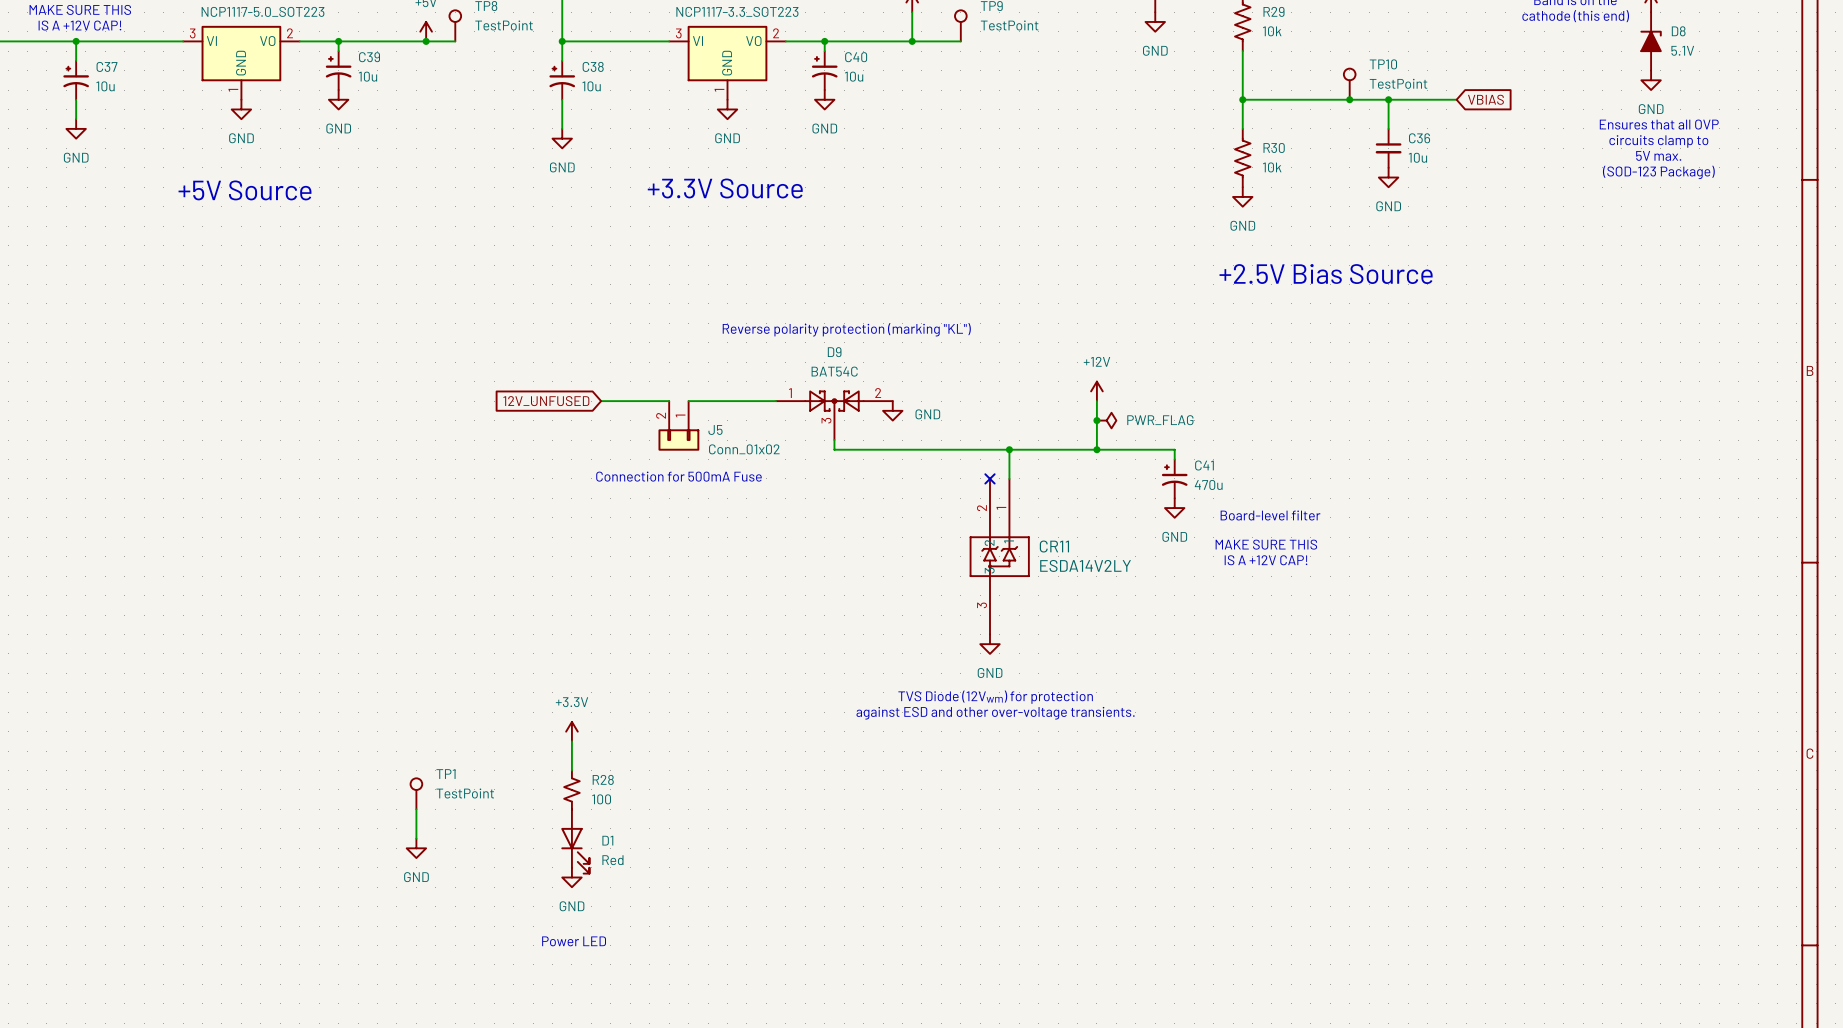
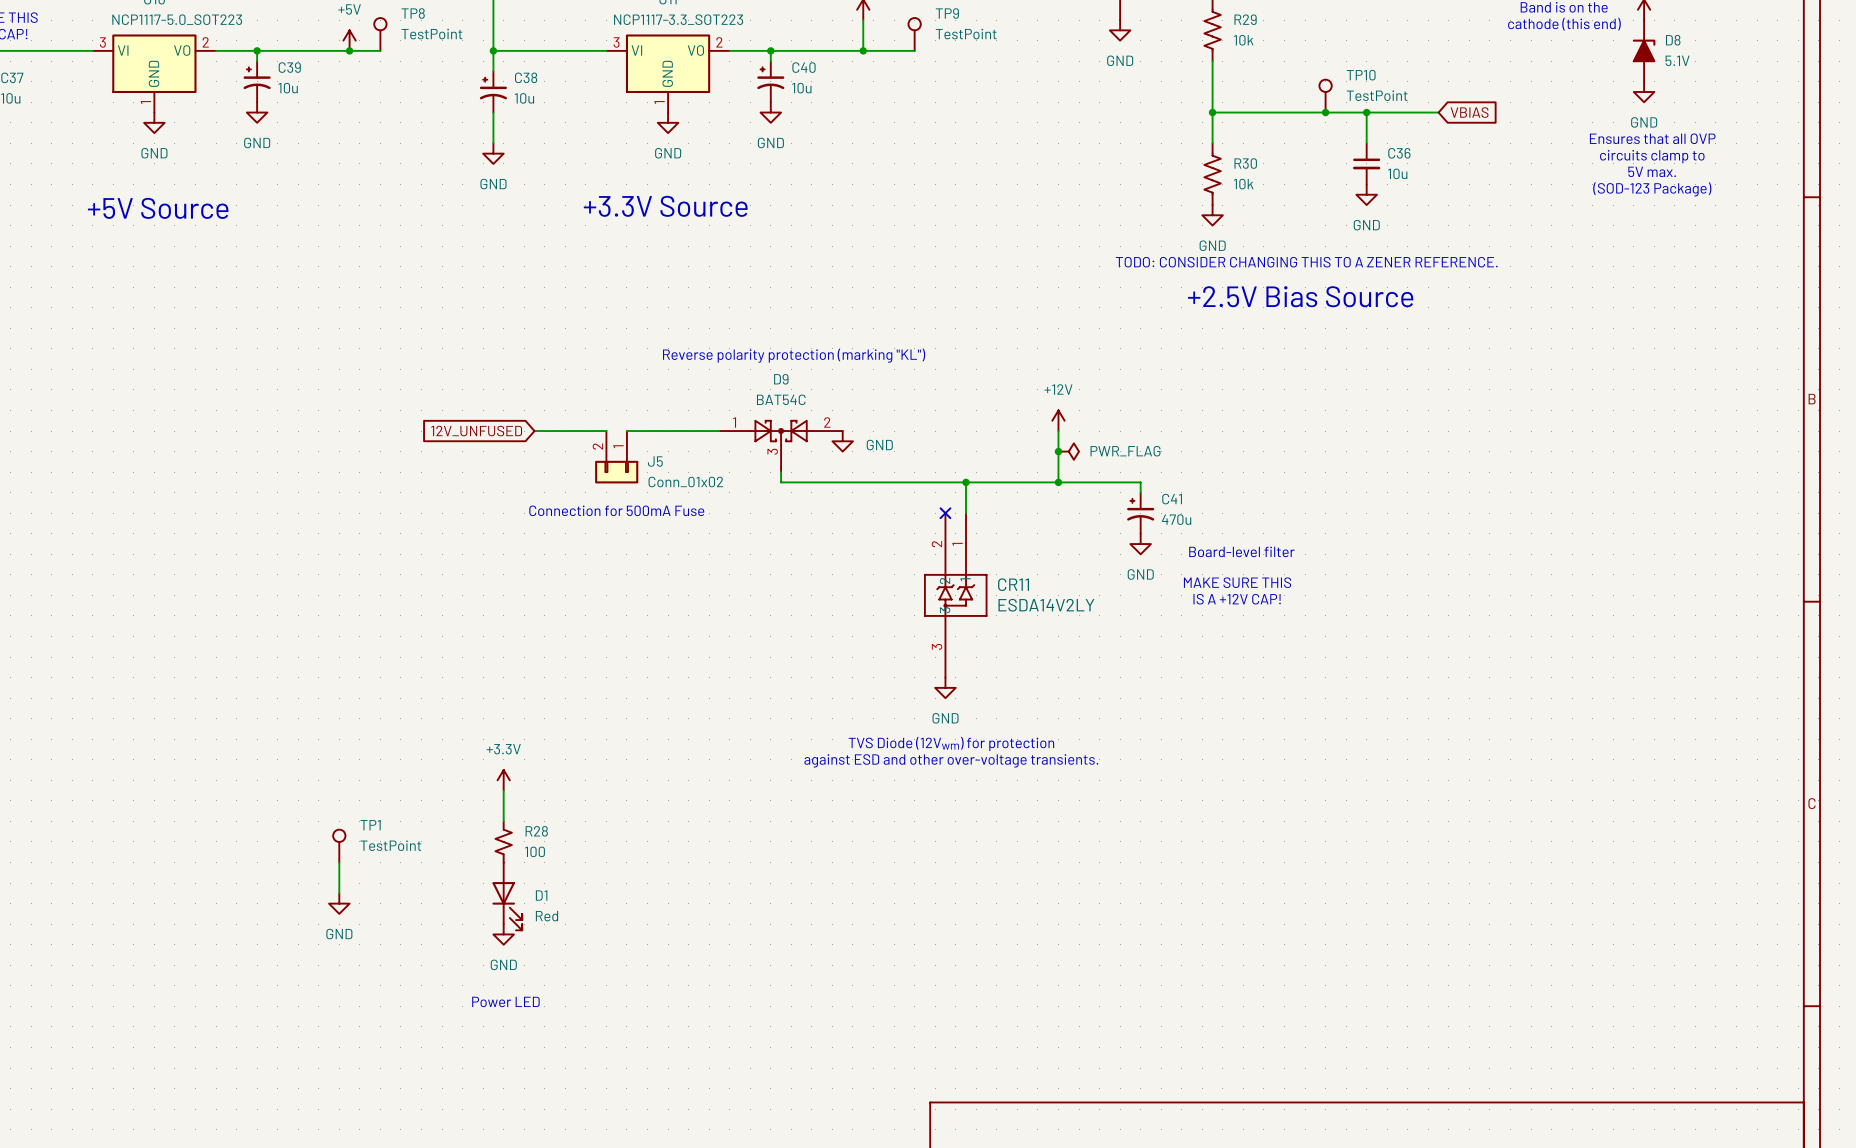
text: none -> TODO: CONSIDER CHANGING THIS TO A ZENER REFERENCE. (1306, 262)

